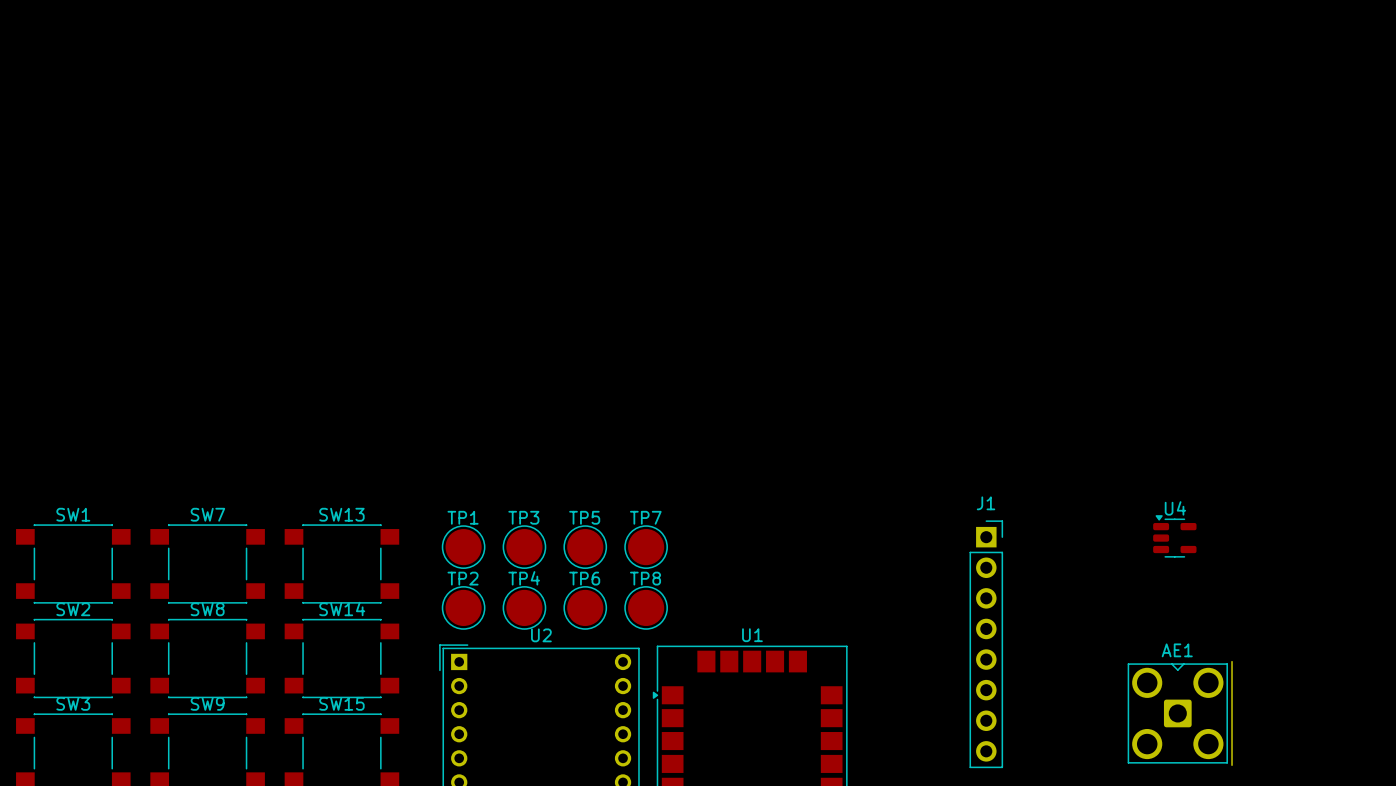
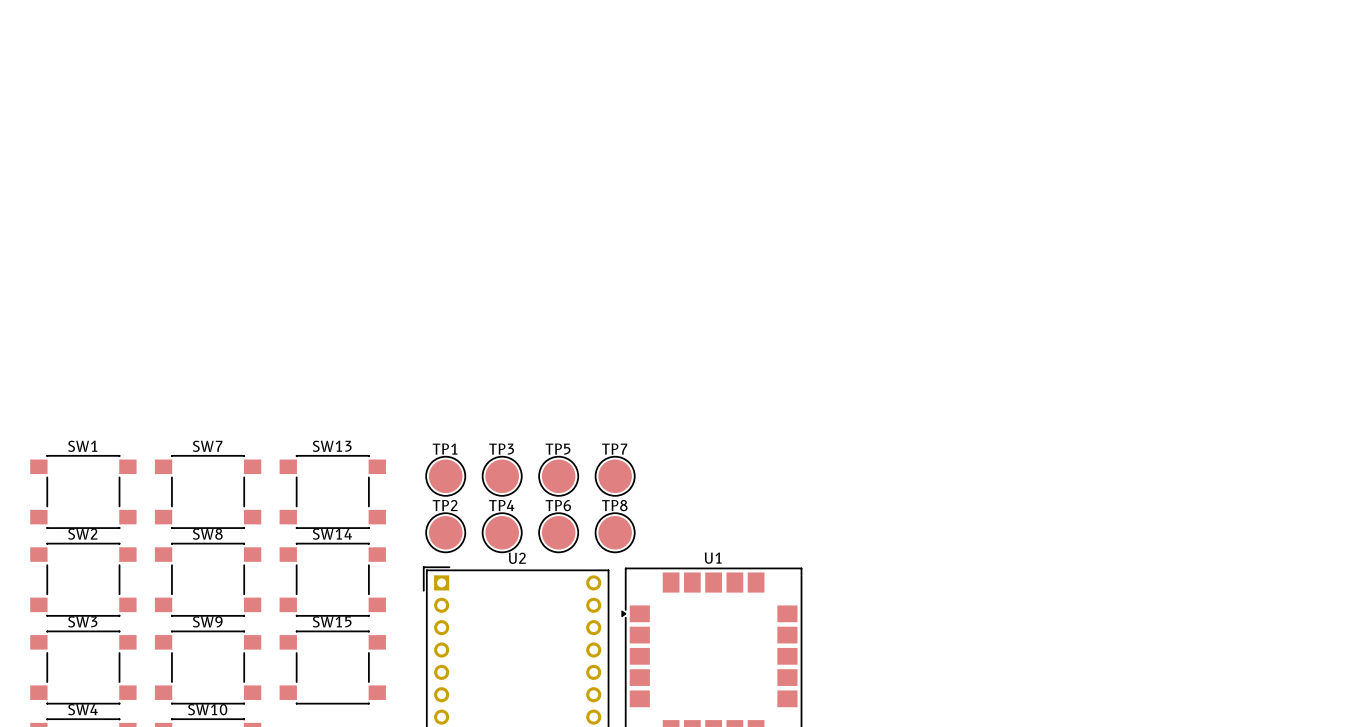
U4: (1174, 536) -> none
J1: (986, 644) -> none
AE1: (1180, 713) -> none

